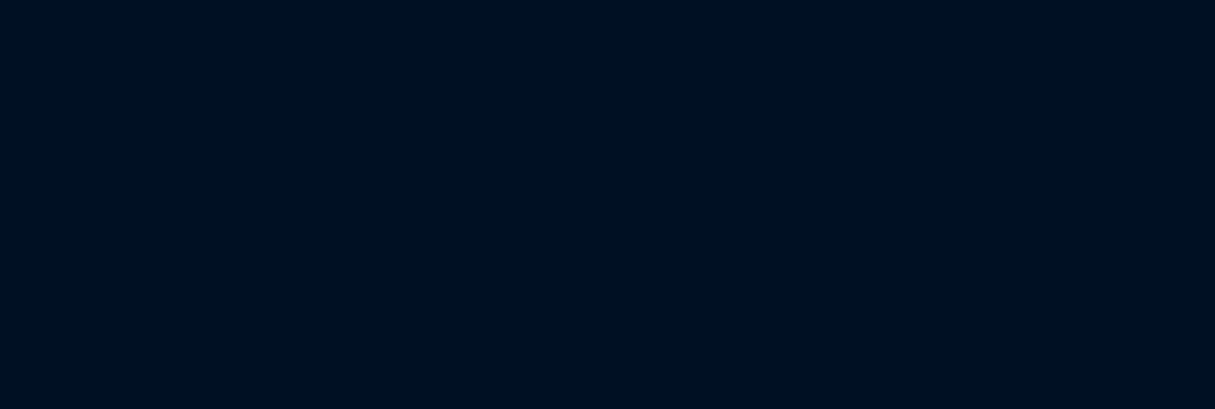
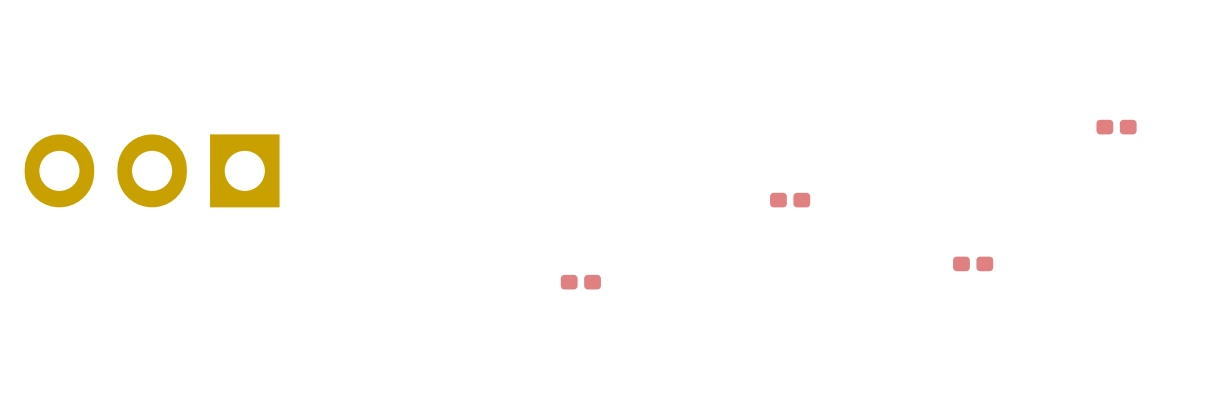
part: none -> (1116, 127)
part: none -> (152, 170)
part: none -> (790, 200)
part: none -> (973, 263)
part: none -> (580, 282)

